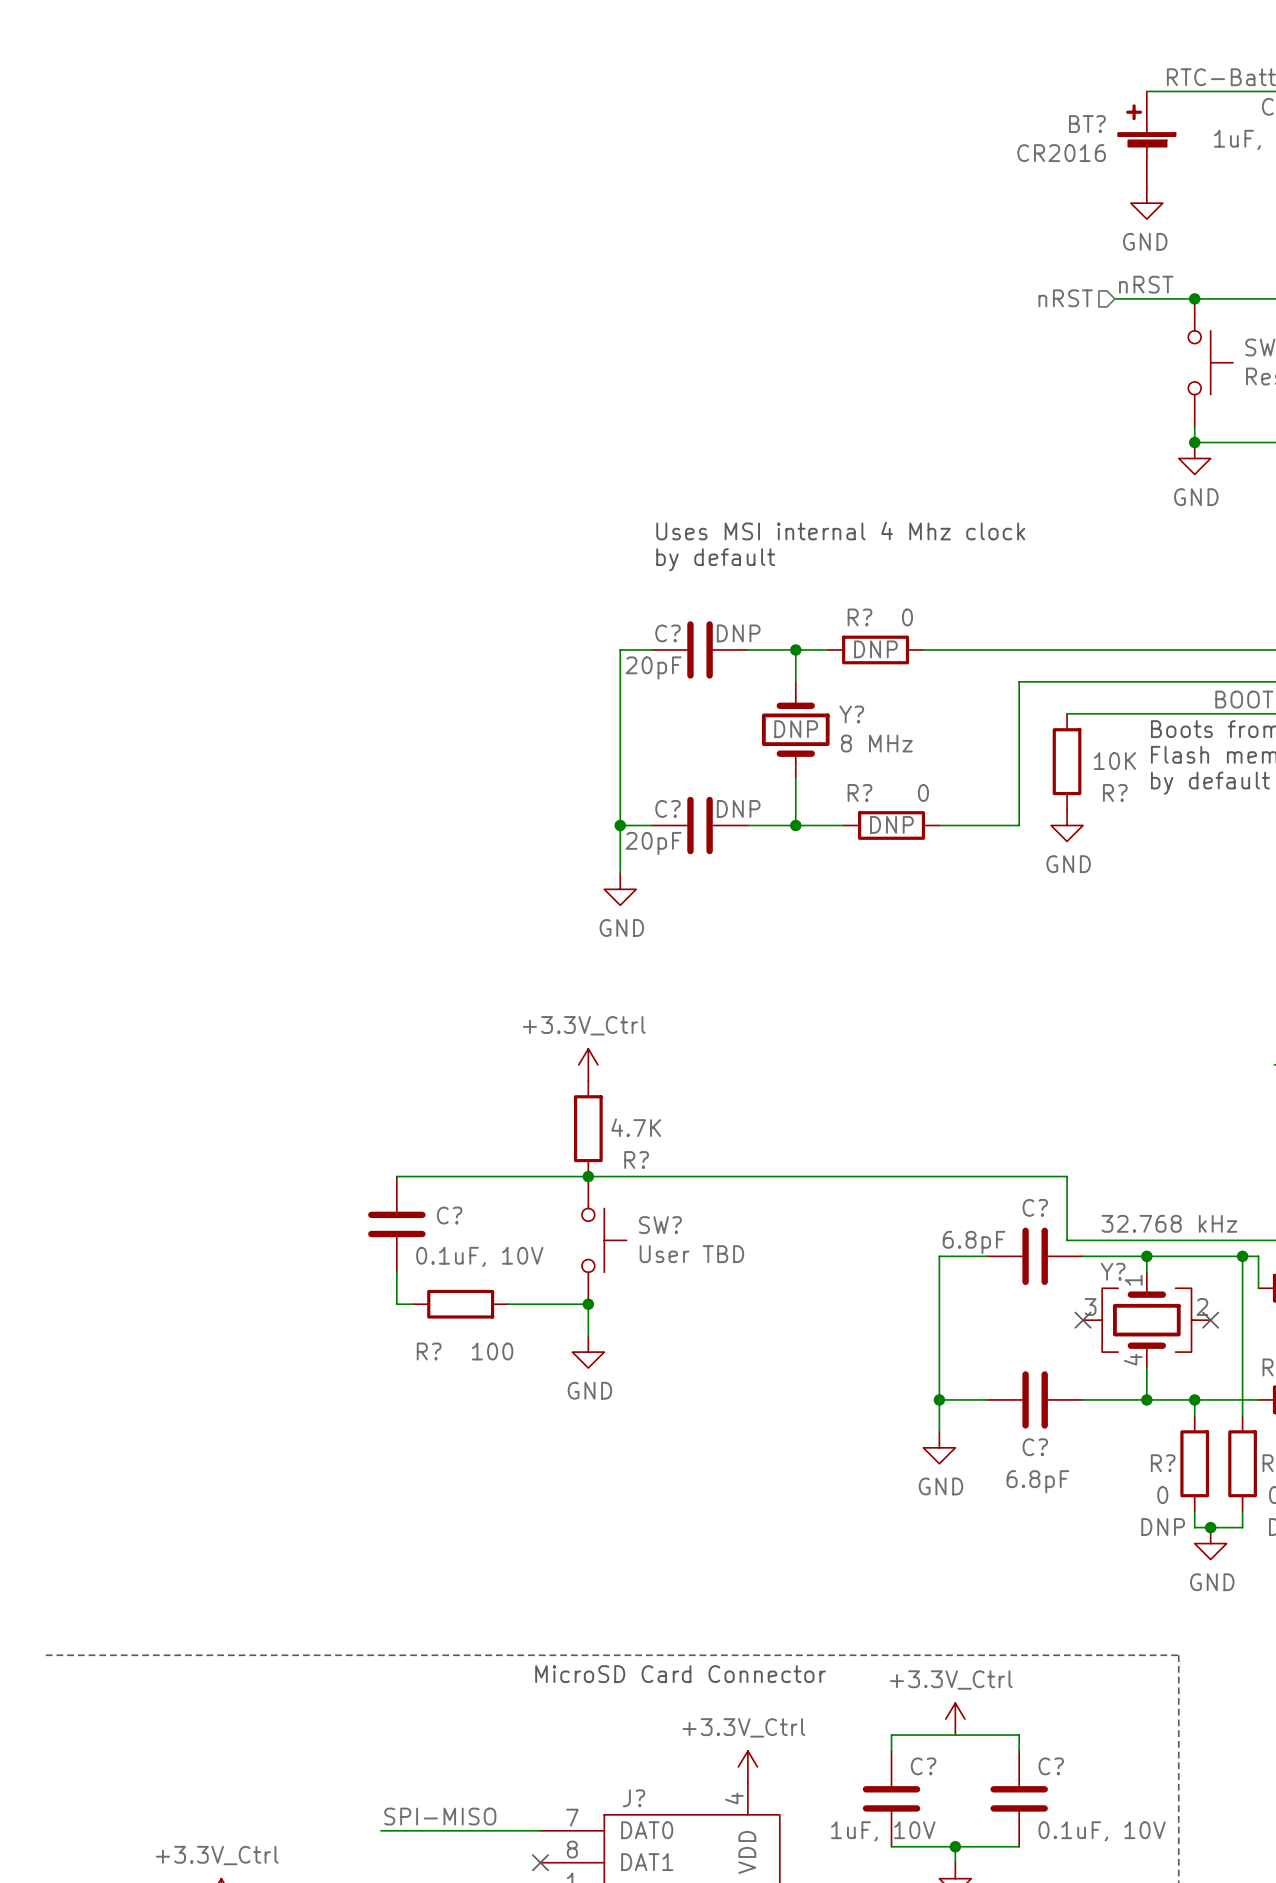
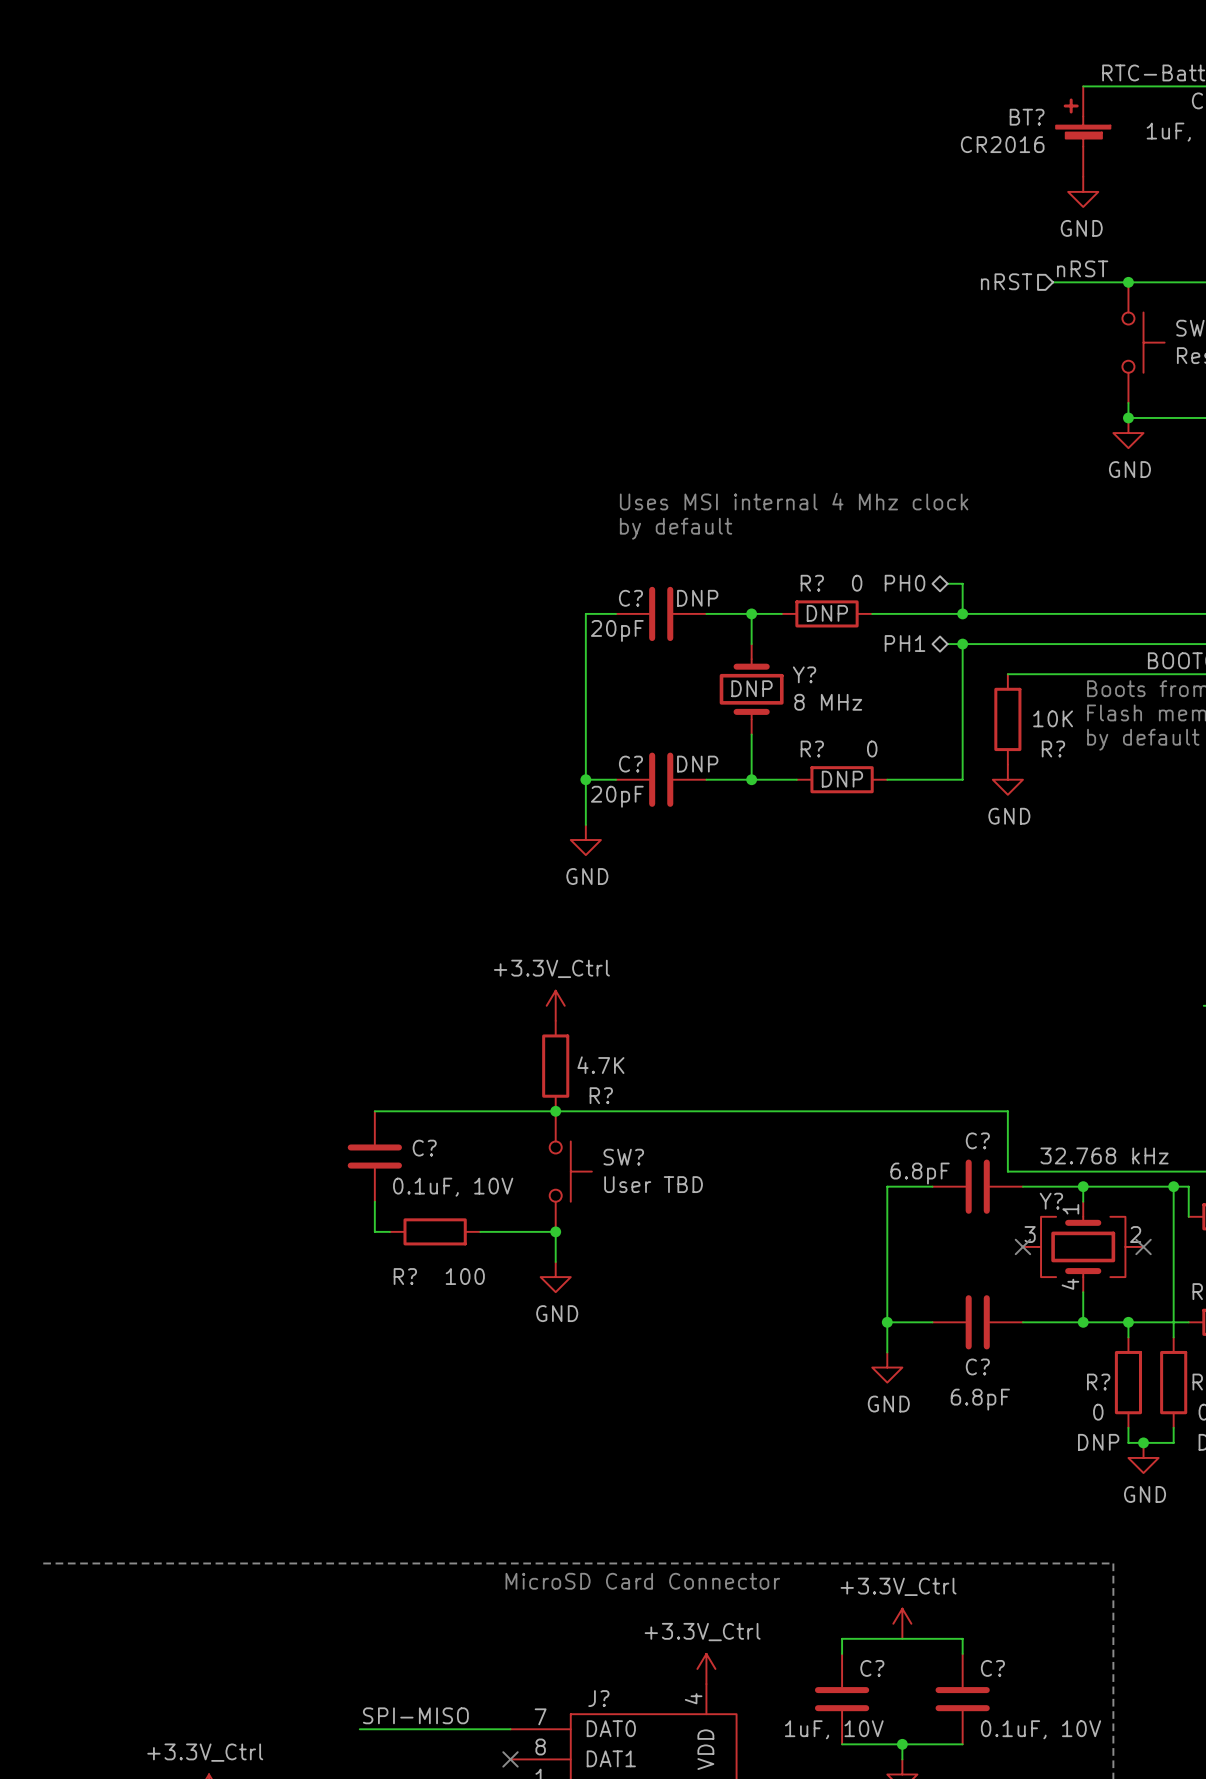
hierarchical label: none -> PH0 (905, 583)
wire: none -> (947, 583) (962, 583) (962, 613)
junction: none -> (962, 613)
hierarchical label: none -> PH1 (905, 643)
wire: none -> (947, 644) (962, 644)
junction: none -> (962, 644)

